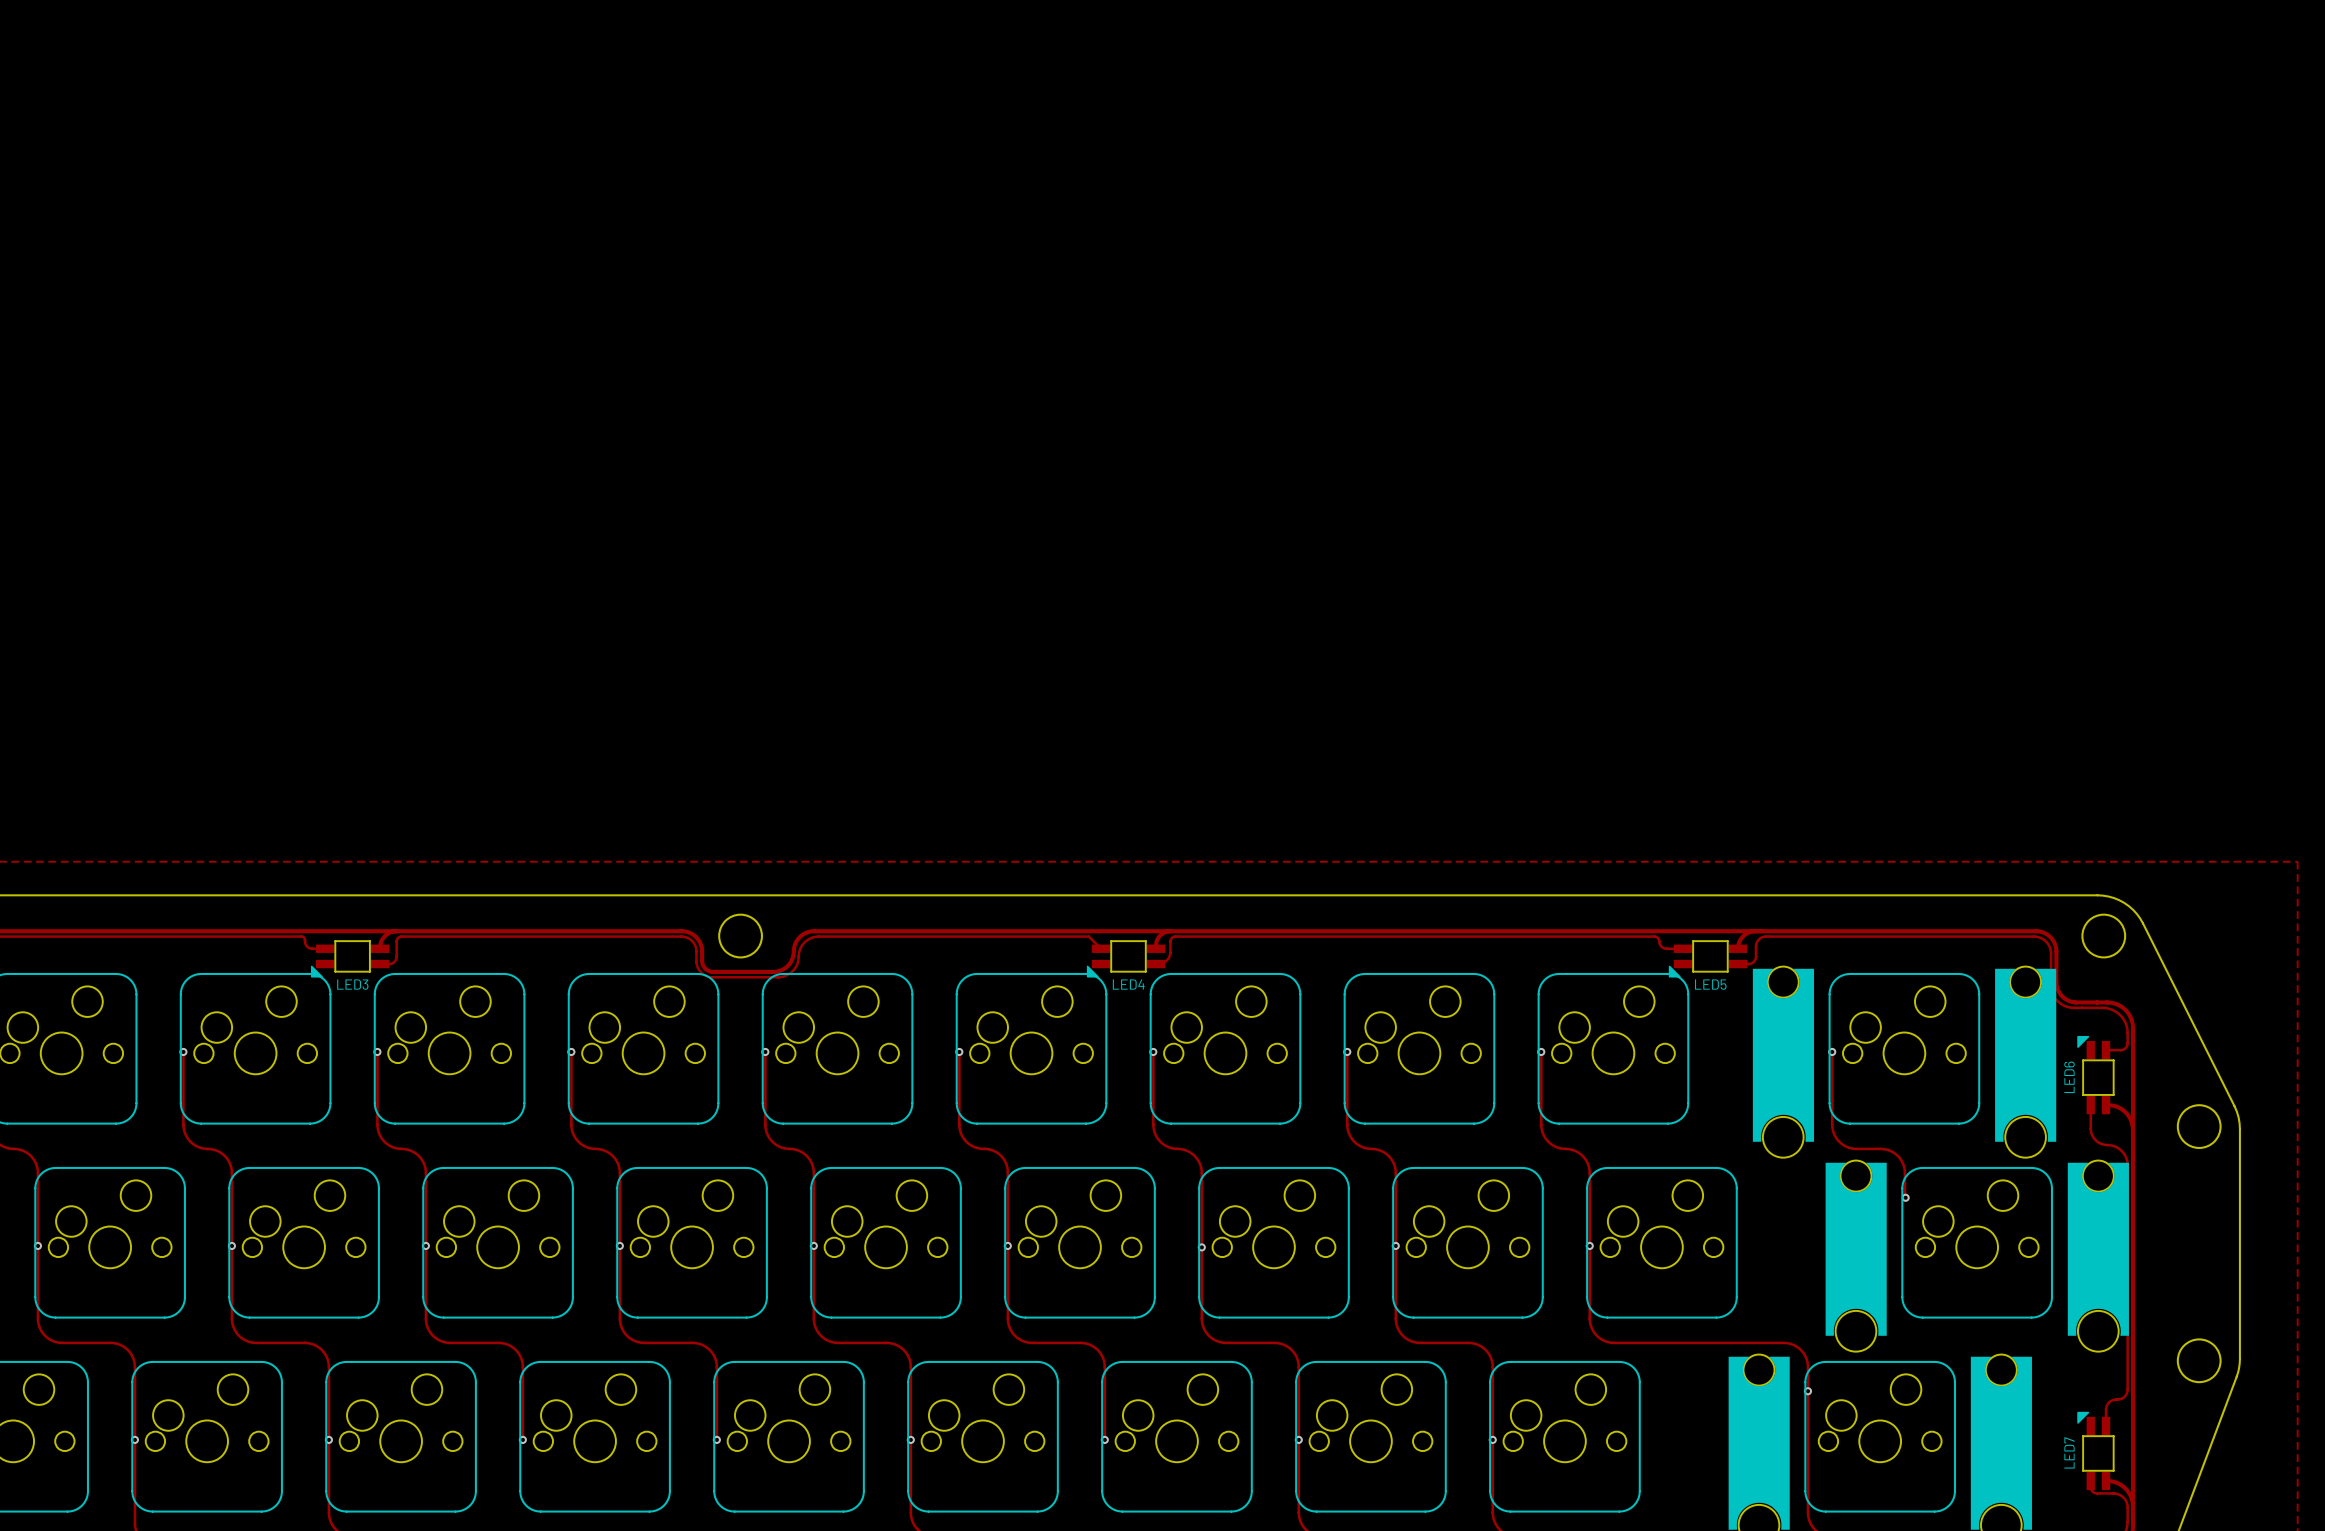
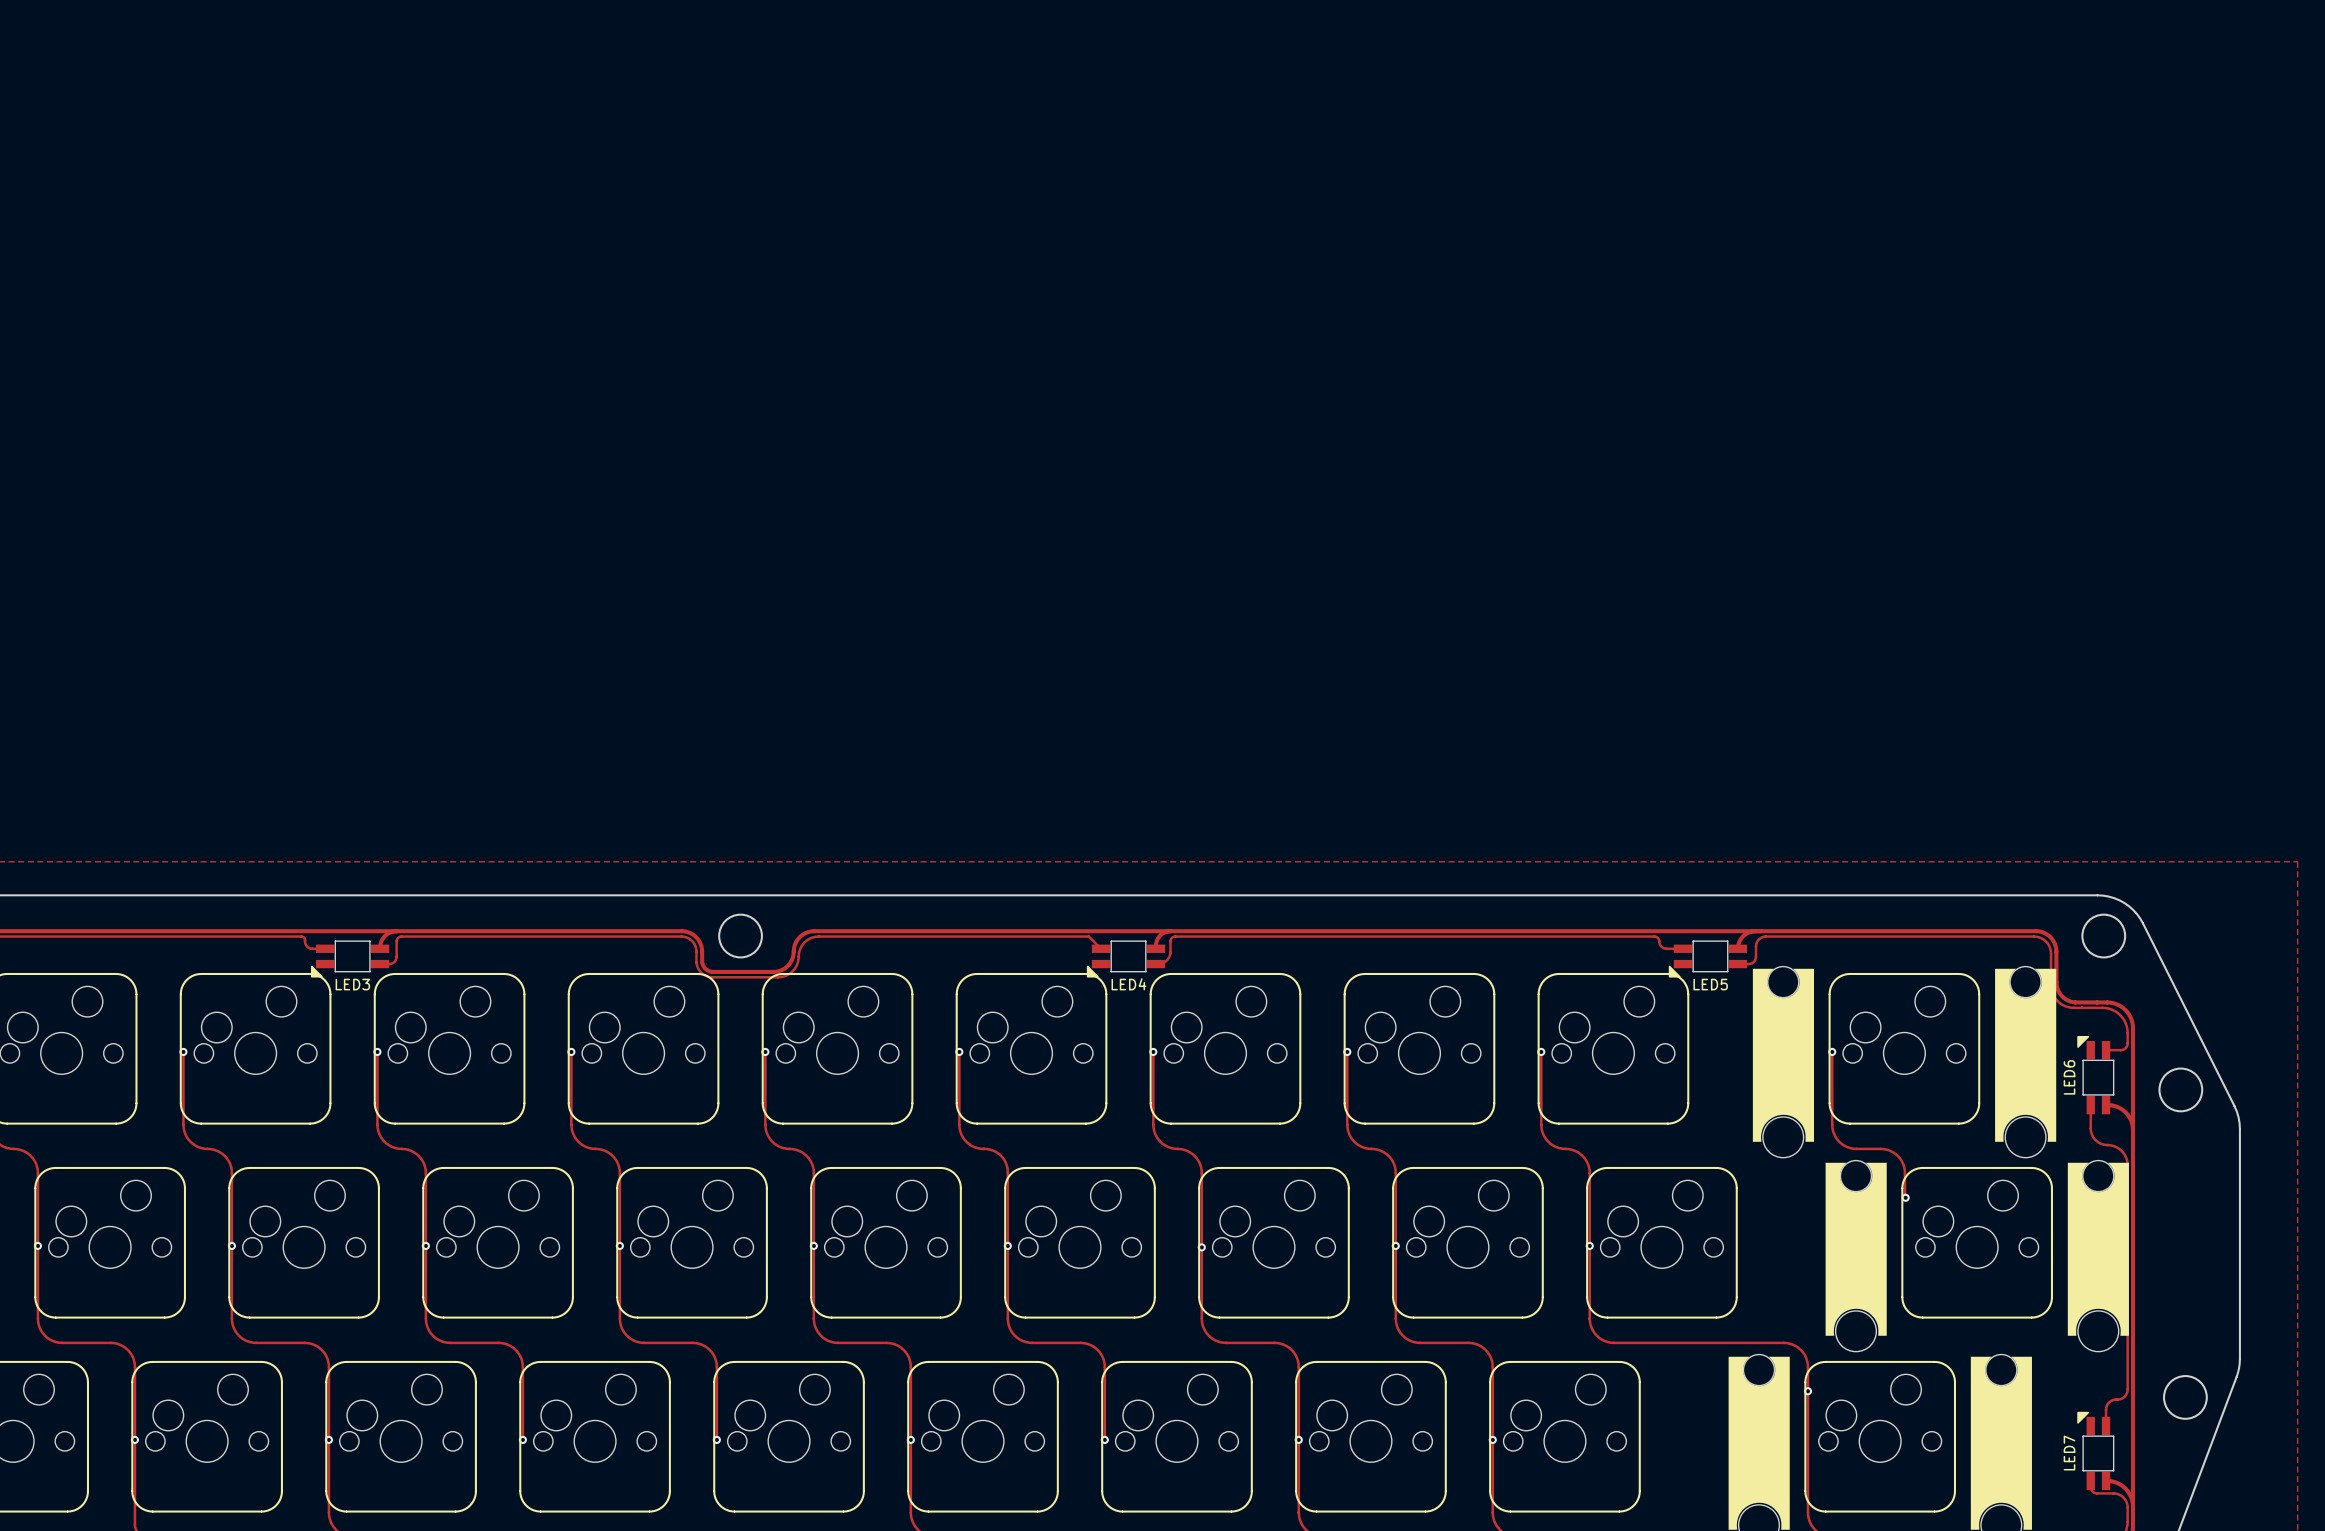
round board edge position: (2199, 1126) -> (2180, 1089)
round board edge position: (2199, 1360) -> (2185, 1397)

